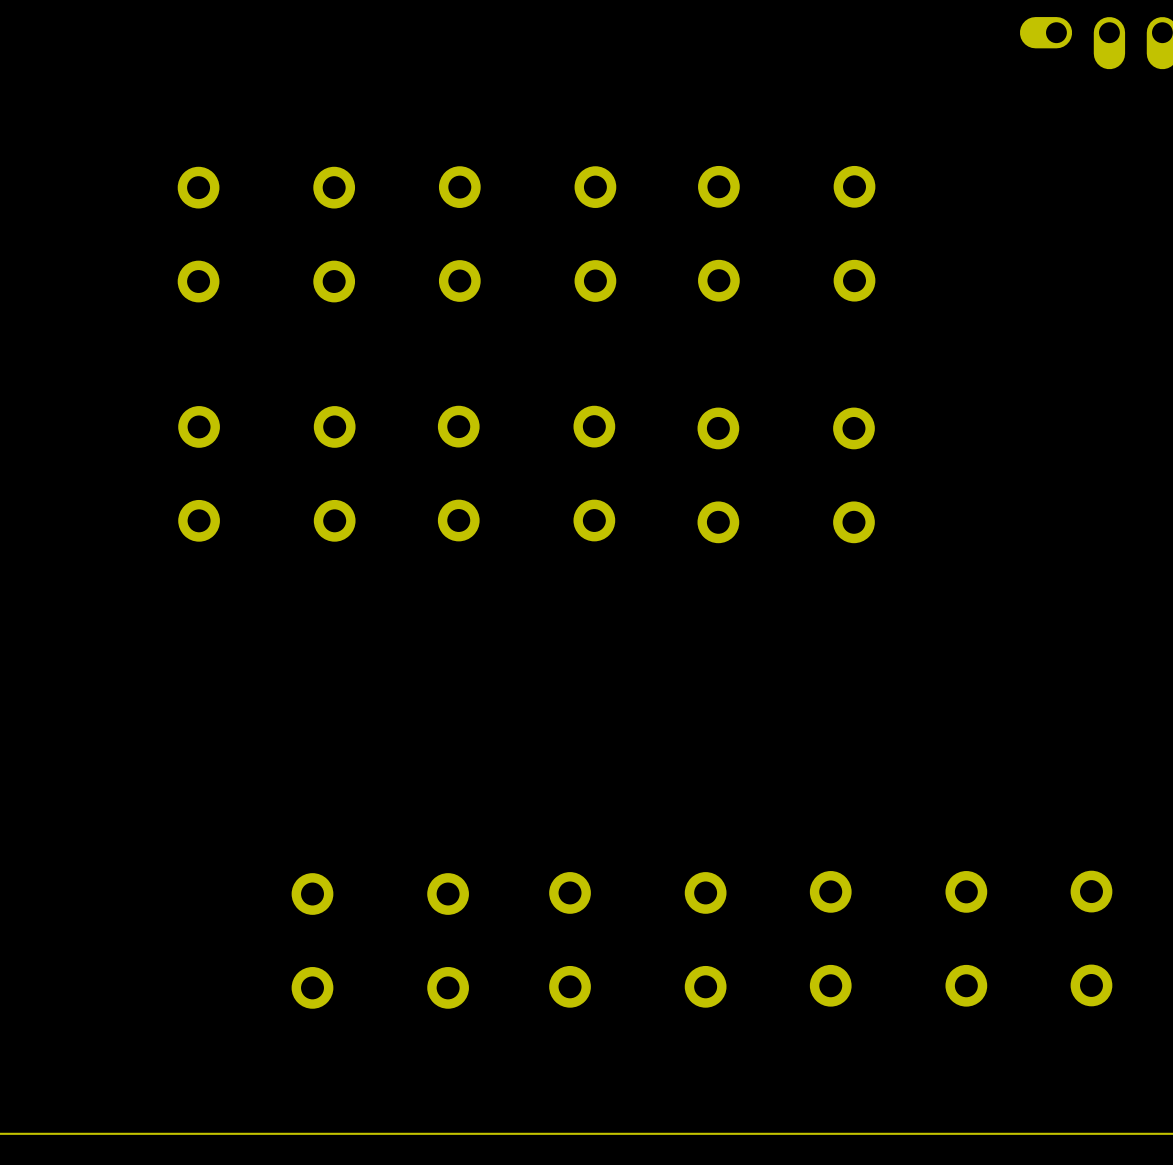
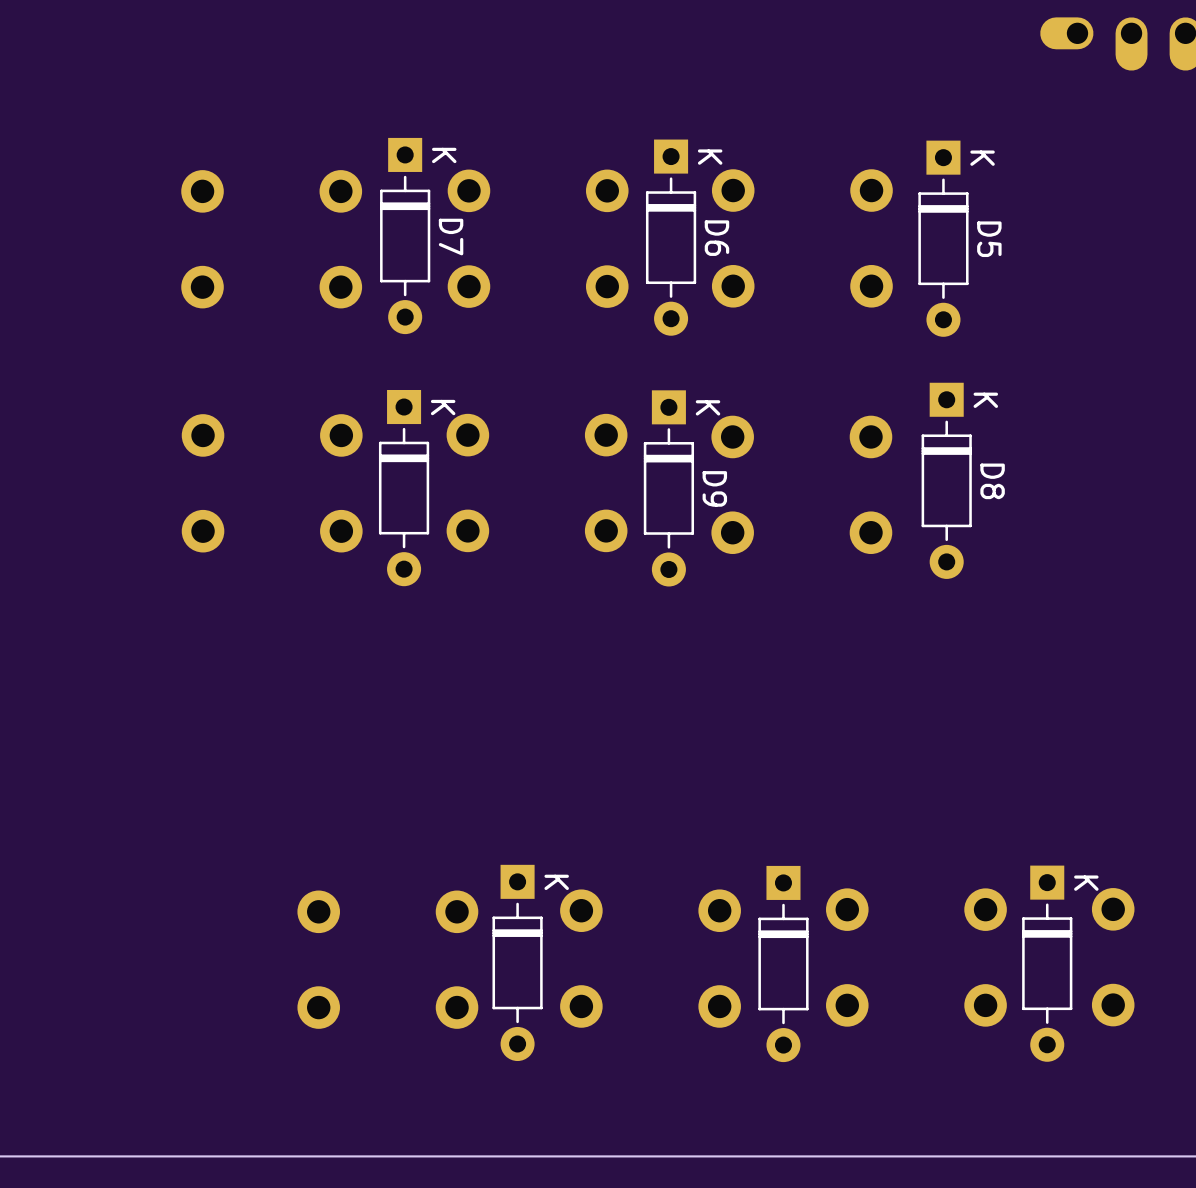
D7: none -> (405, 236)
D6: none -> (671, 237)
D5: none -> (943, 238)
D8: none -> (946, 480)
part: none -> (404, 488)
D9: none -> (668, 488)
part: none -> (517, 962)
part: none -> (1047, 963)
part: none -> (783, 964)

